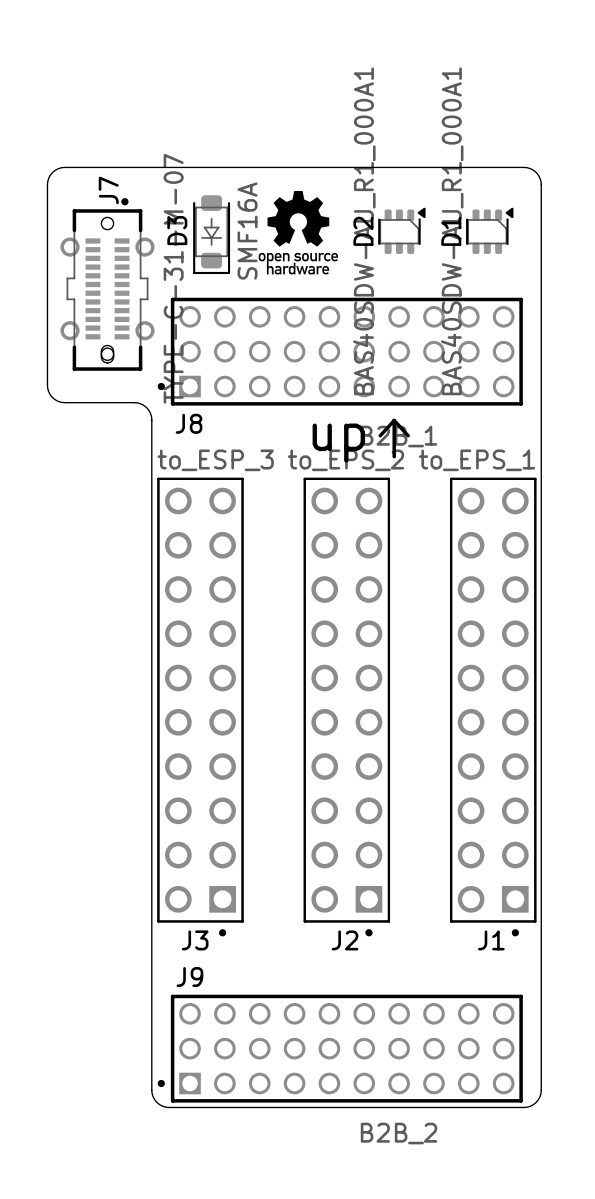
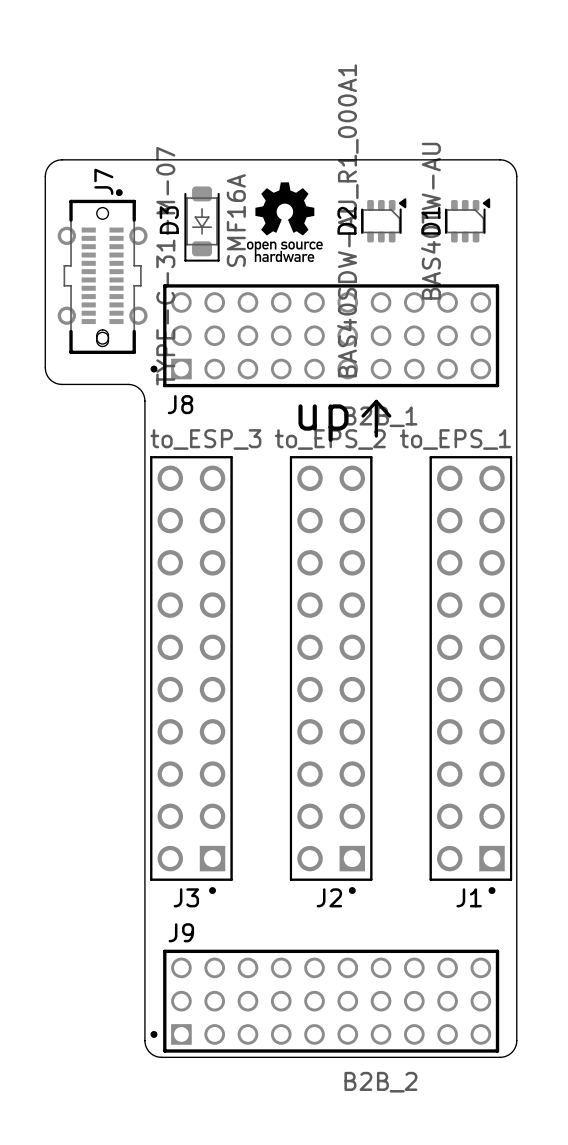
D1 value: BAS40SDW-AU_R1_000A1 (452, 231) -> BAS40TW-AU (430, 221)

